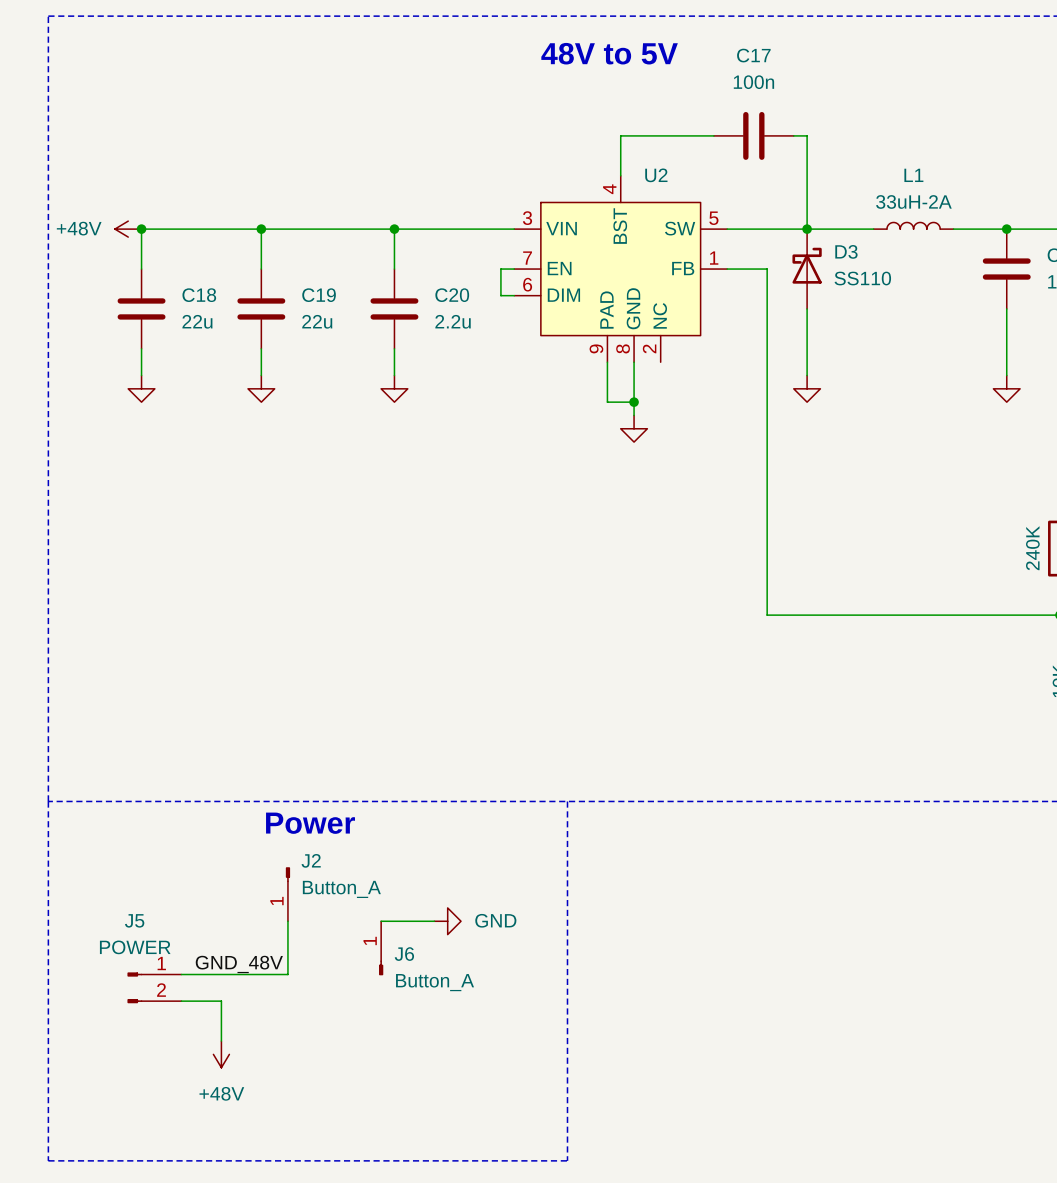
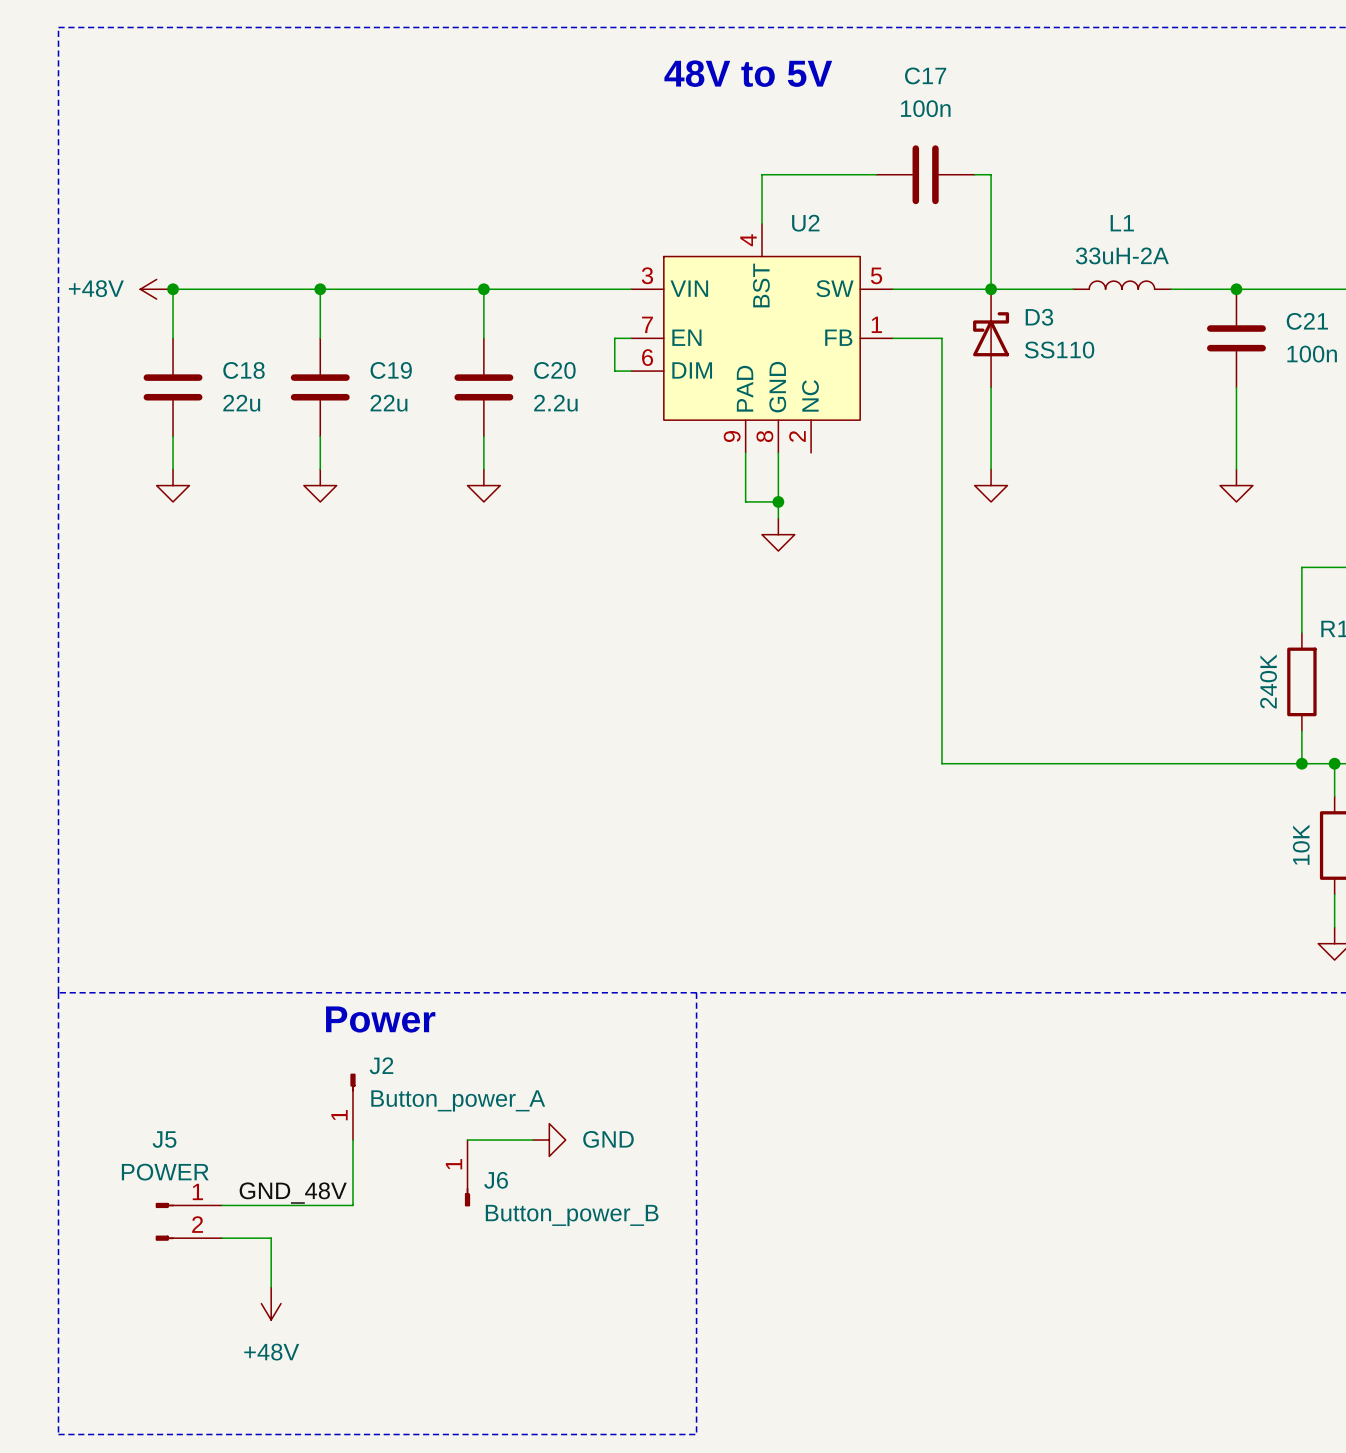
J2 value: Button_A (341, 889) -> Button_power_A (458, 1100)
J6 value: Button_A (435, 982) -> Button_power_B (572, 1215)

